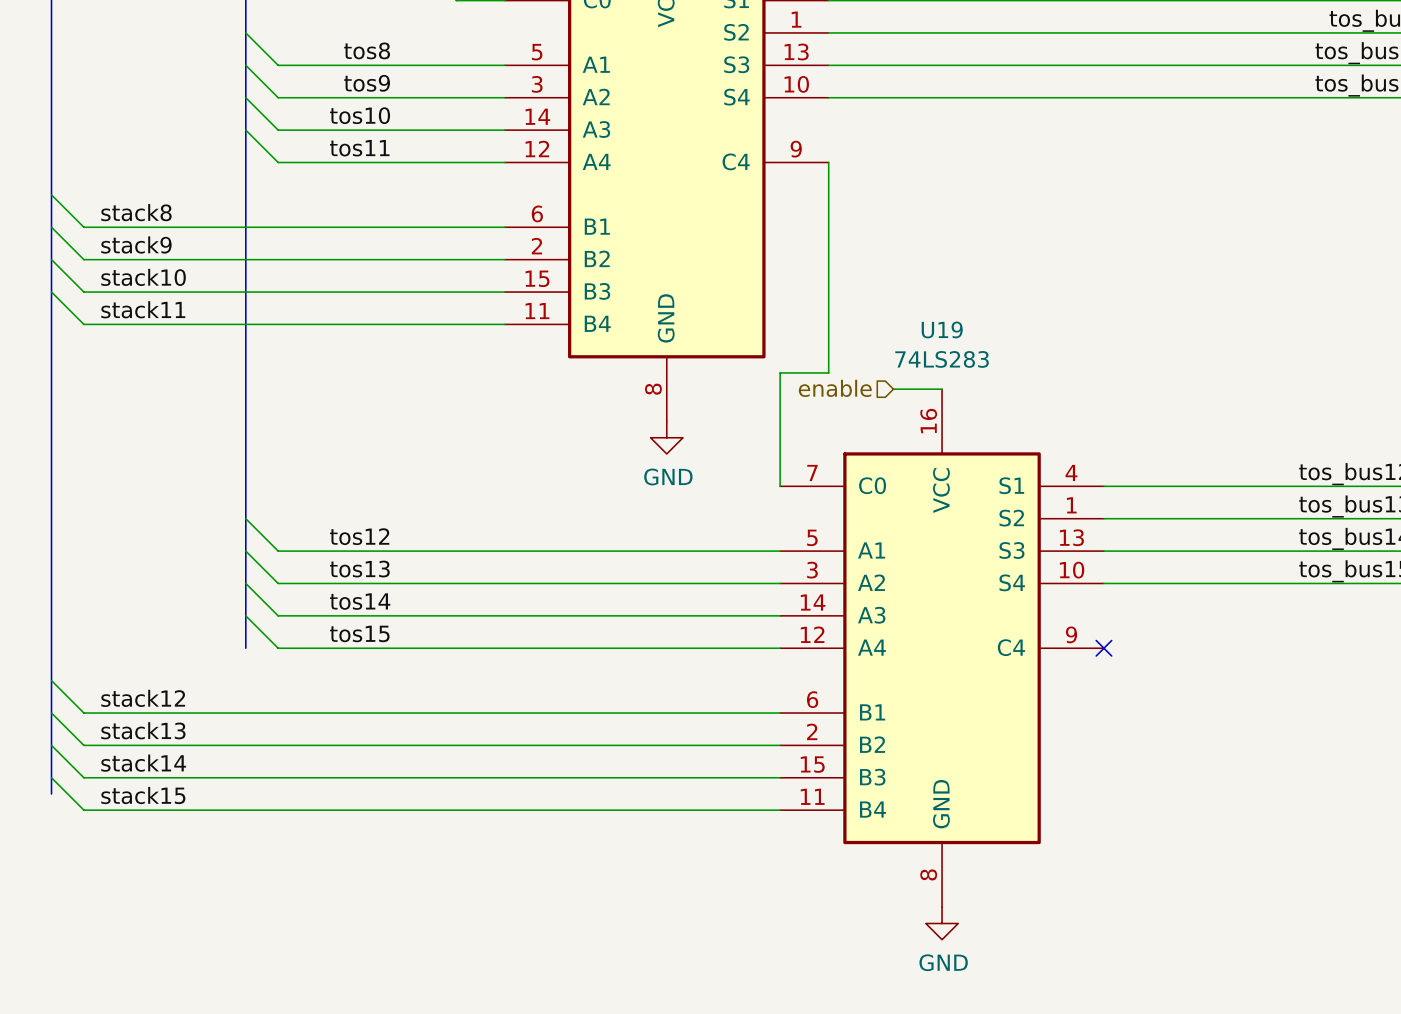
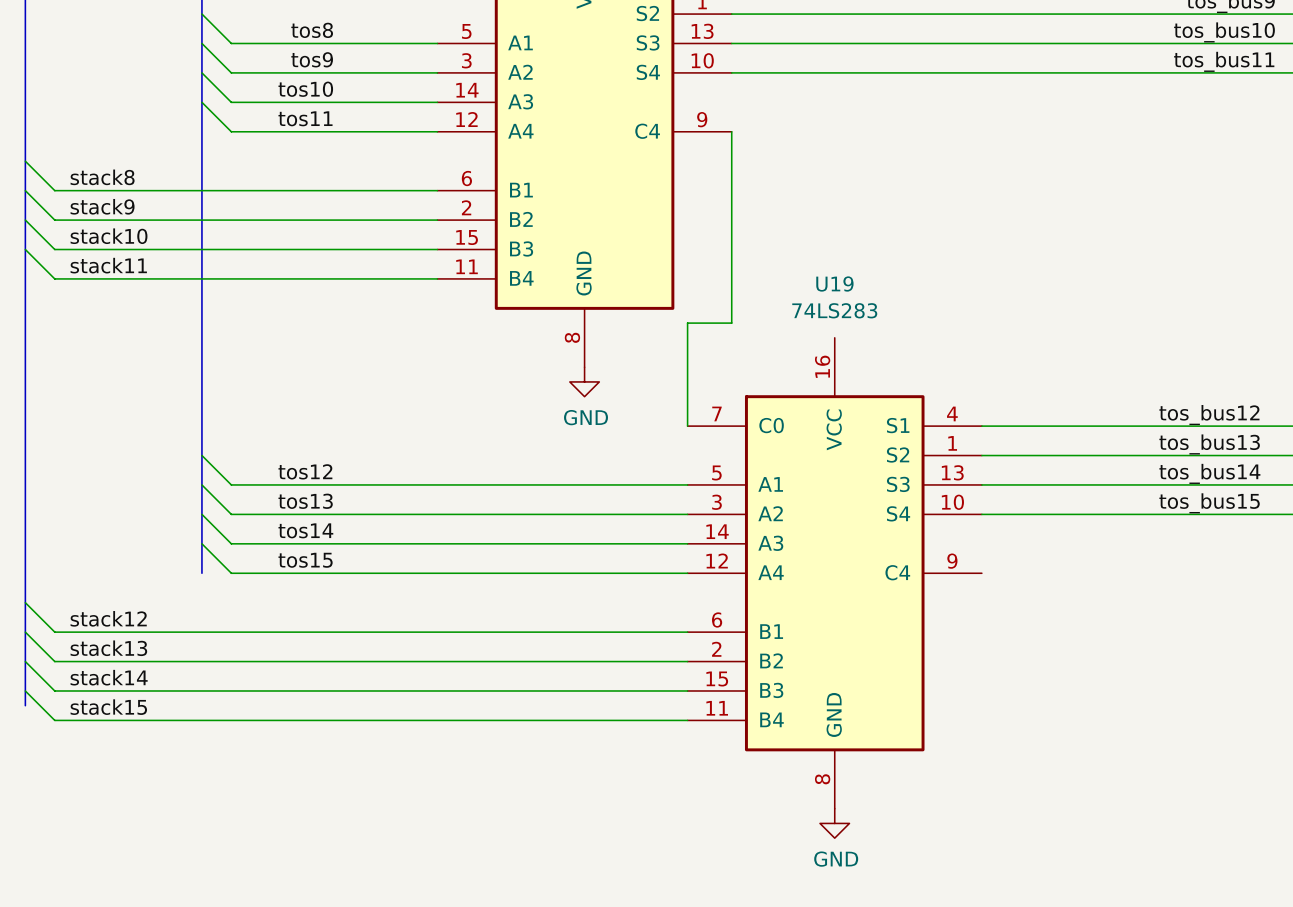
hierarchical label: enable (835, 388) -> none
wire: (893, 389) (942, 389) -> none
no-connect mark: (1103, 648) -> none

